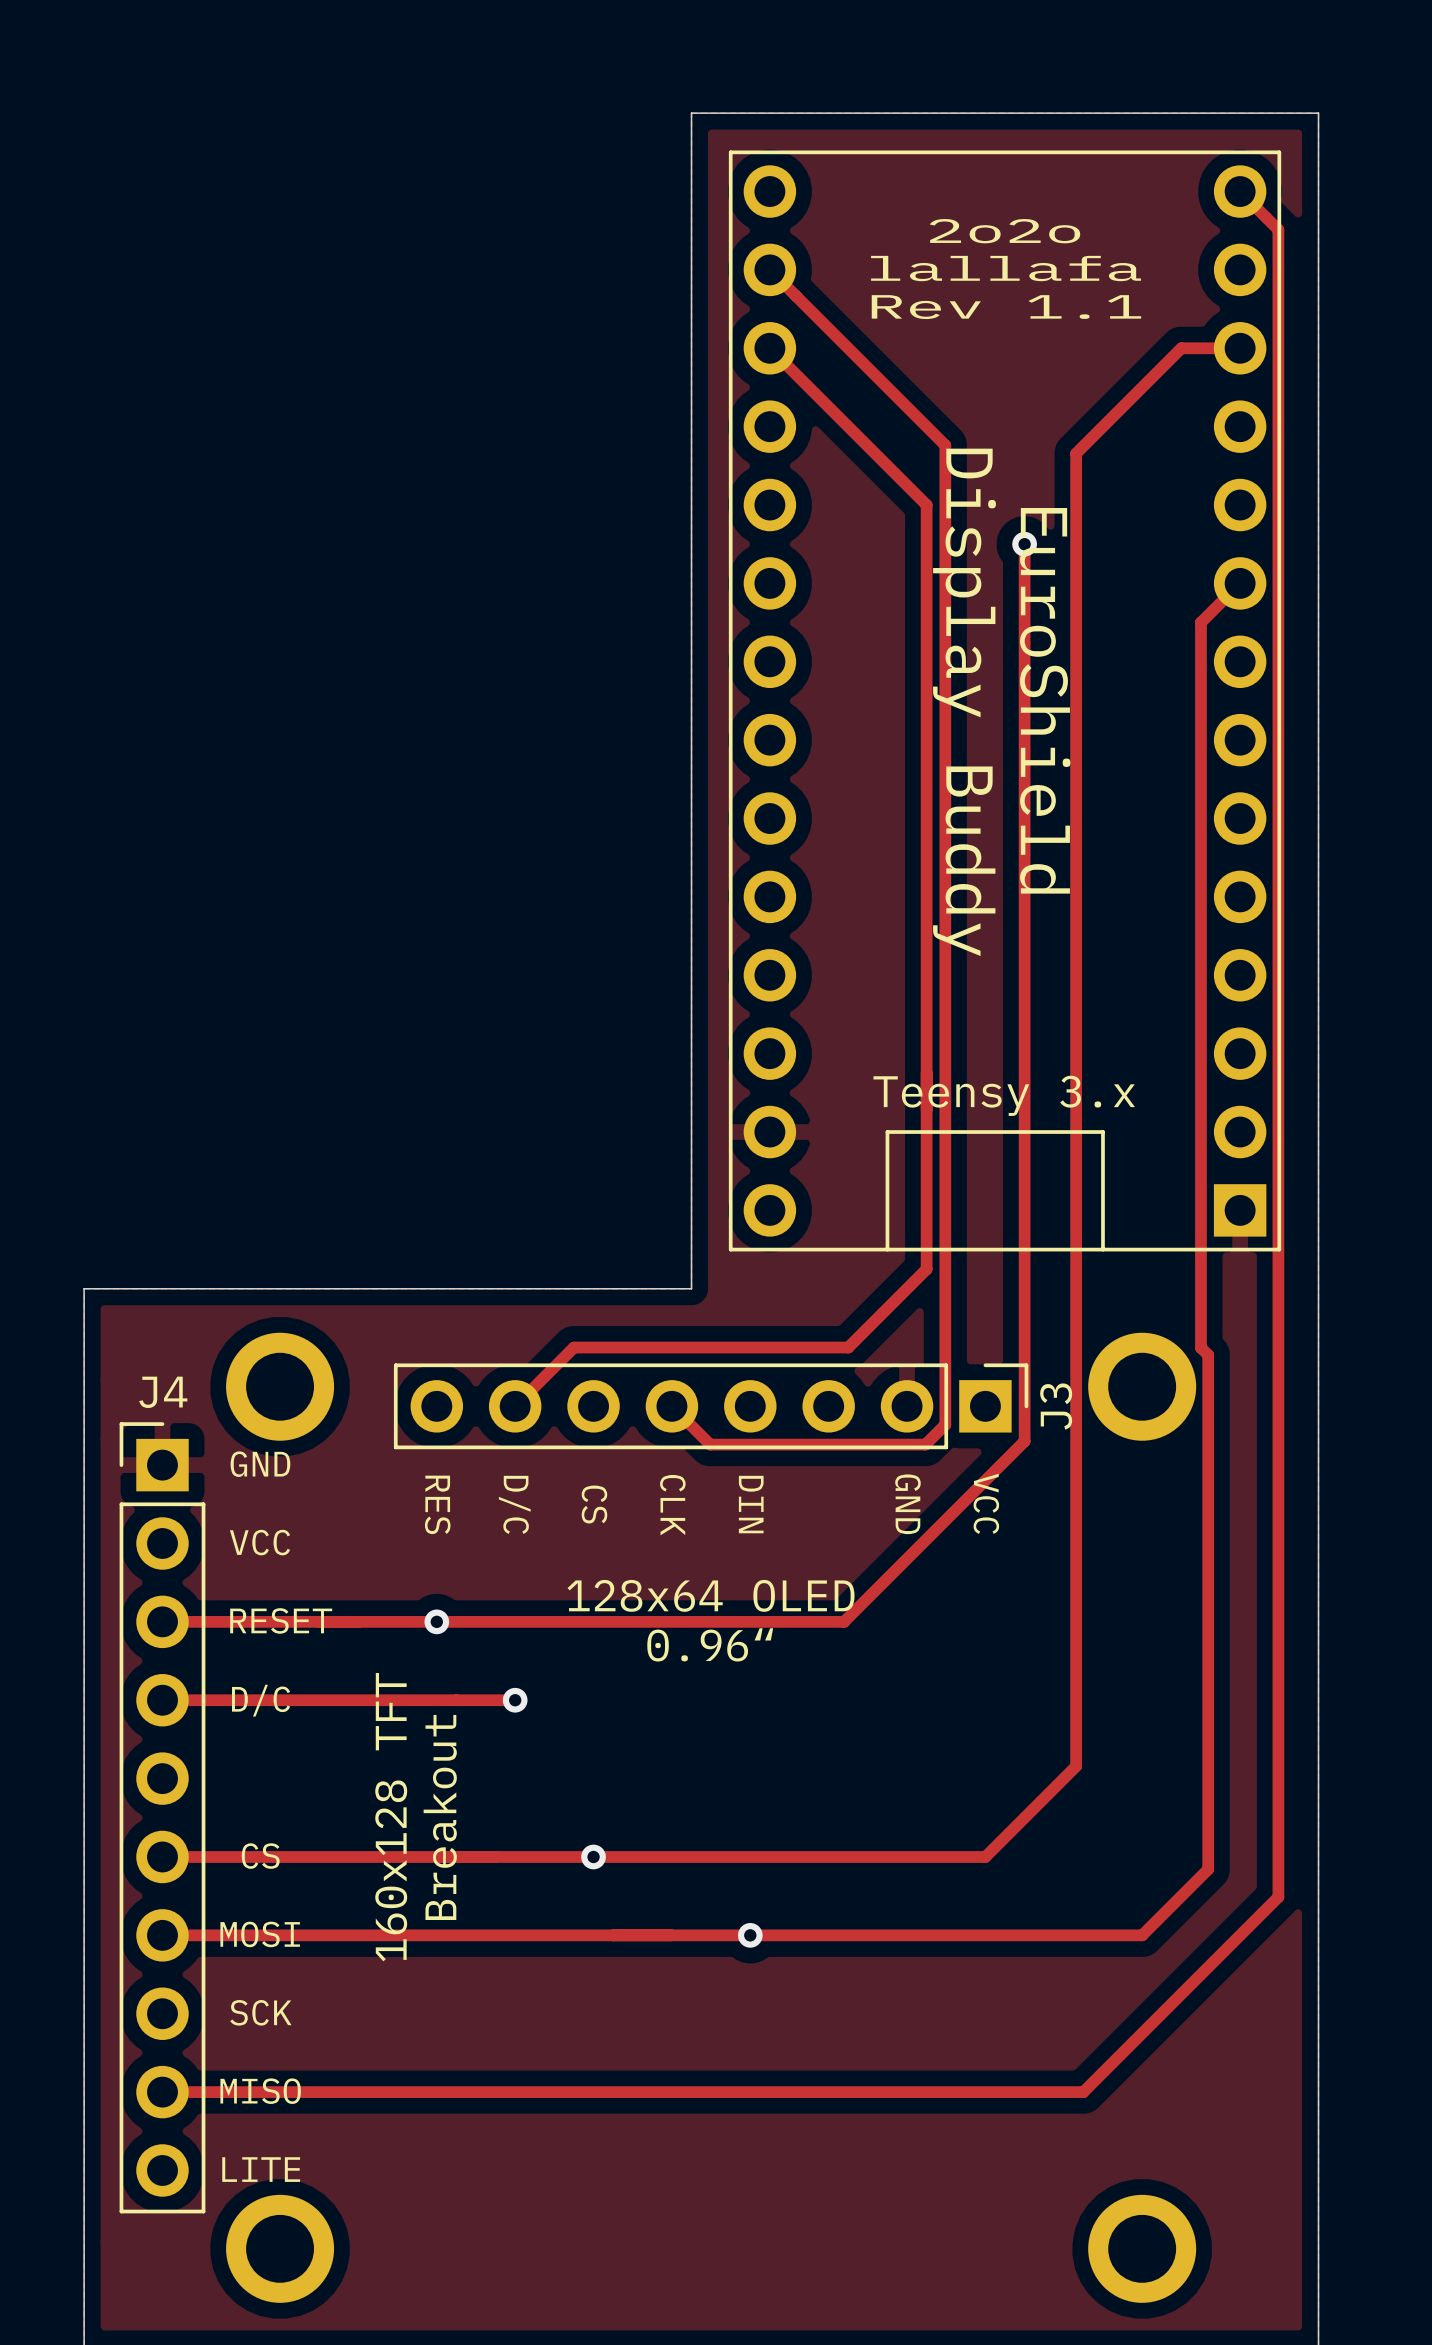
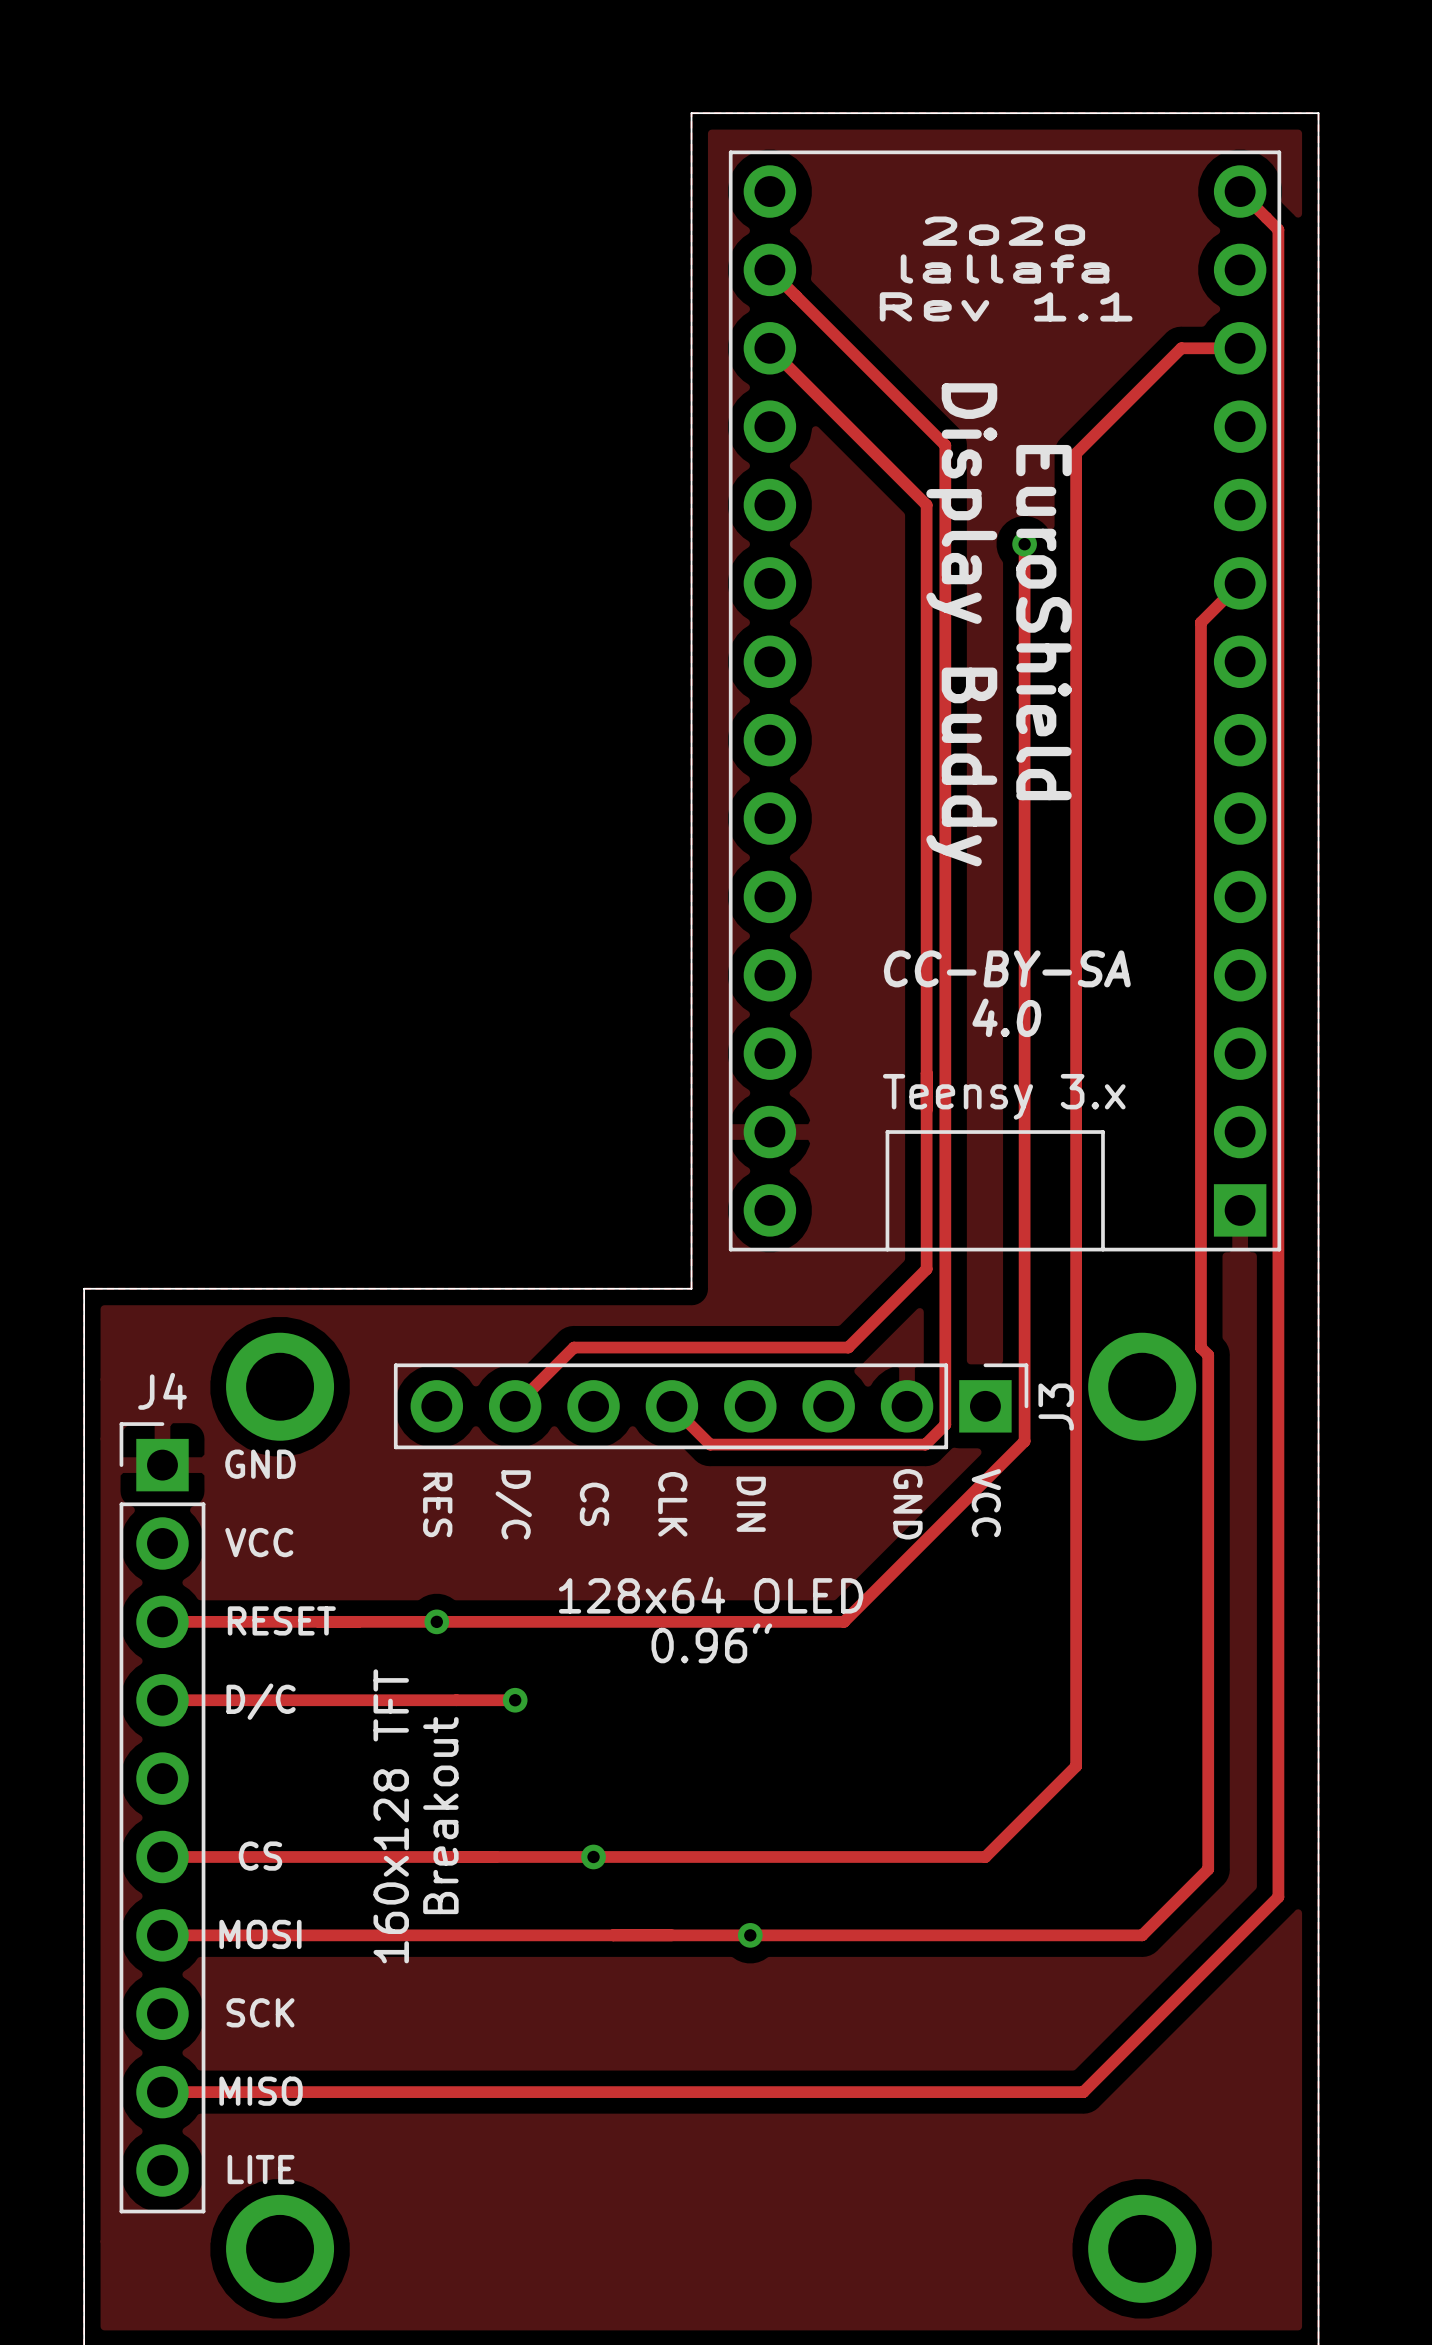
text position: EuroShield (1045, 700) -> EuroShield (1044, 622)
text position: Display Buddy (964, 702) -> Display Buddy (961, 624)
text: none -> CC-BY-SA (1007, 968)
text: none -> 4.0 (1006, 1017)

